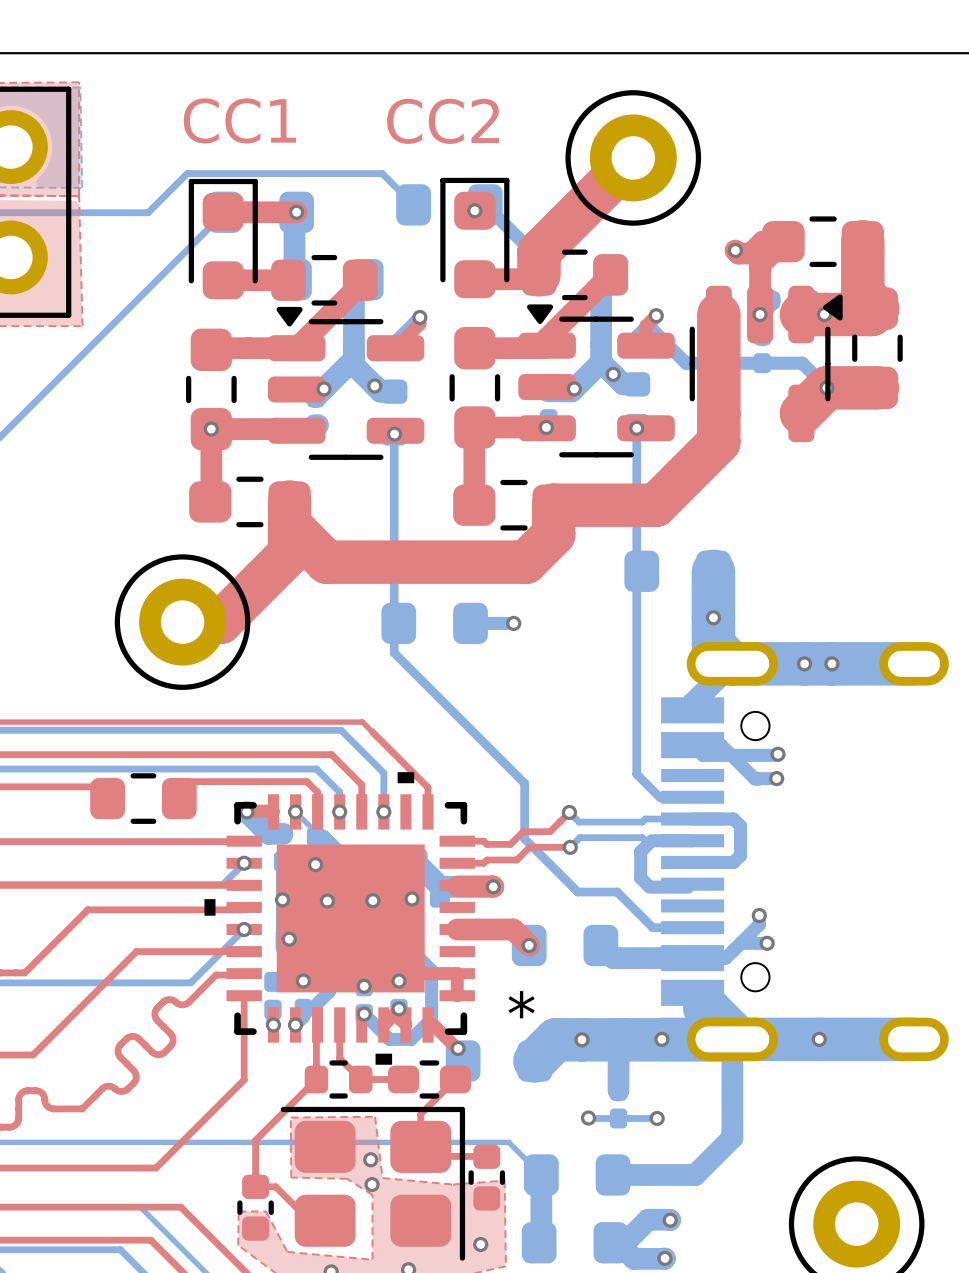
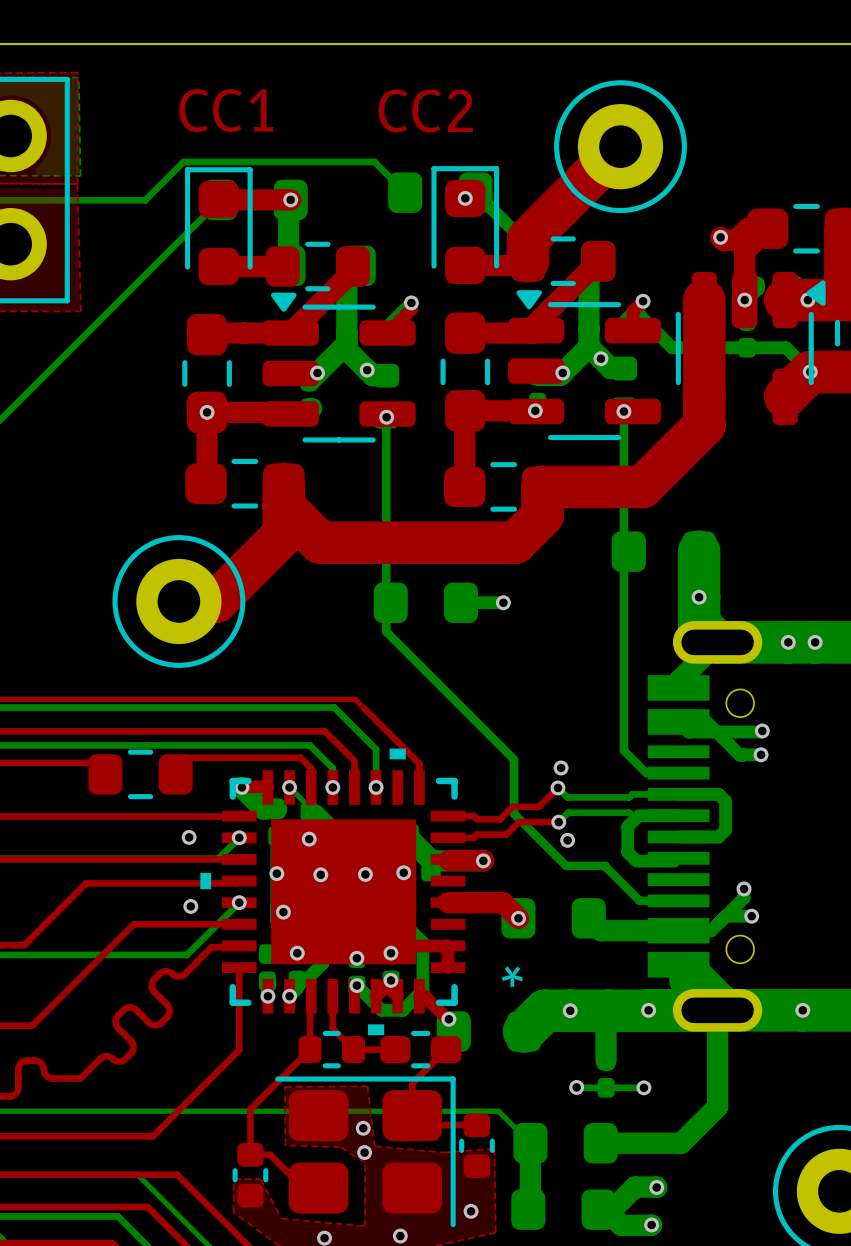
via: none -> (561, 767)
via: none -> (189, 837)
via: none -> (567, 840)
via: none -> (190, 906)

